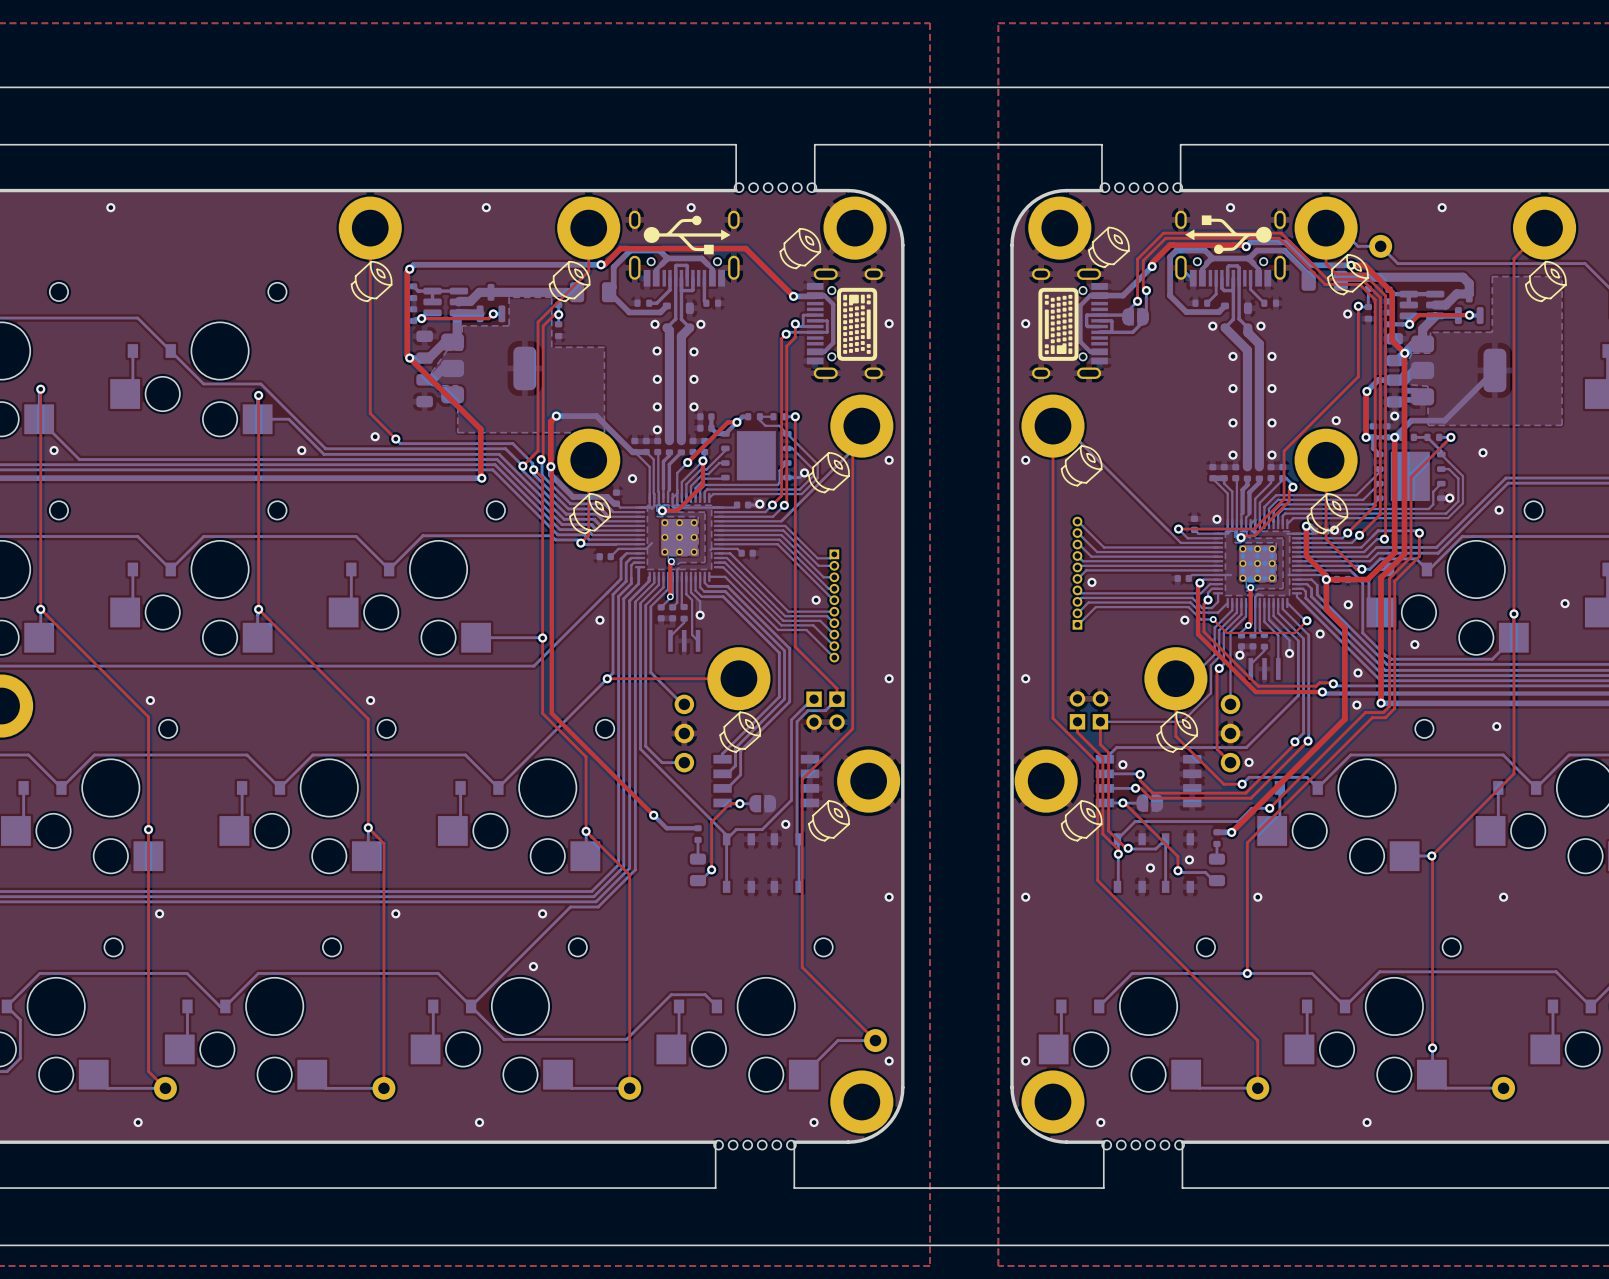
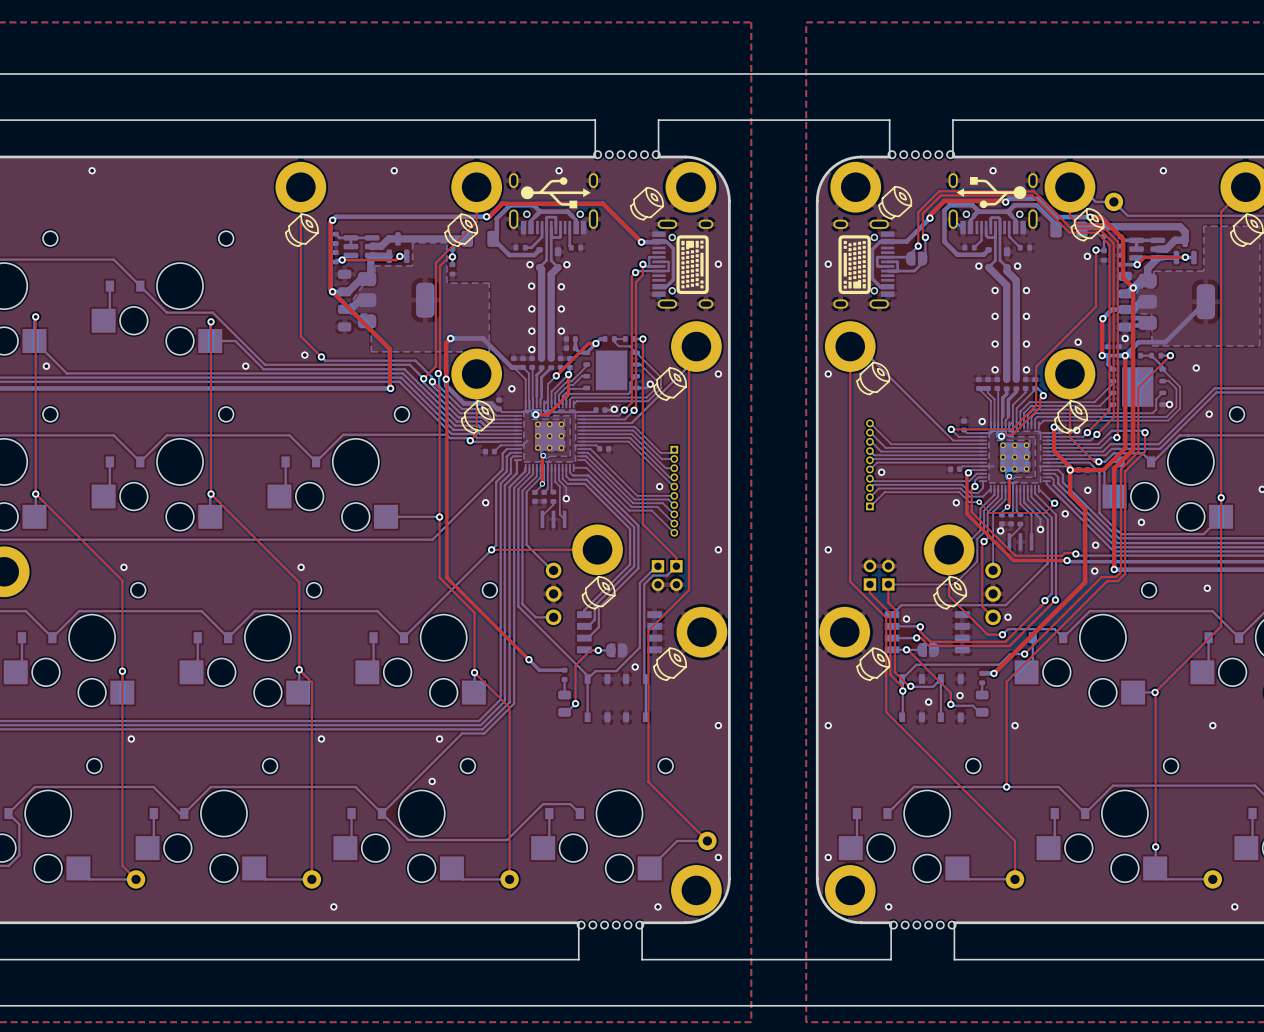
via: (138, 1122) -> none
via position: (479, 1122) -> (333, 906)
via: (1367, 1122) -> none
via: none -> (1234, 906)

